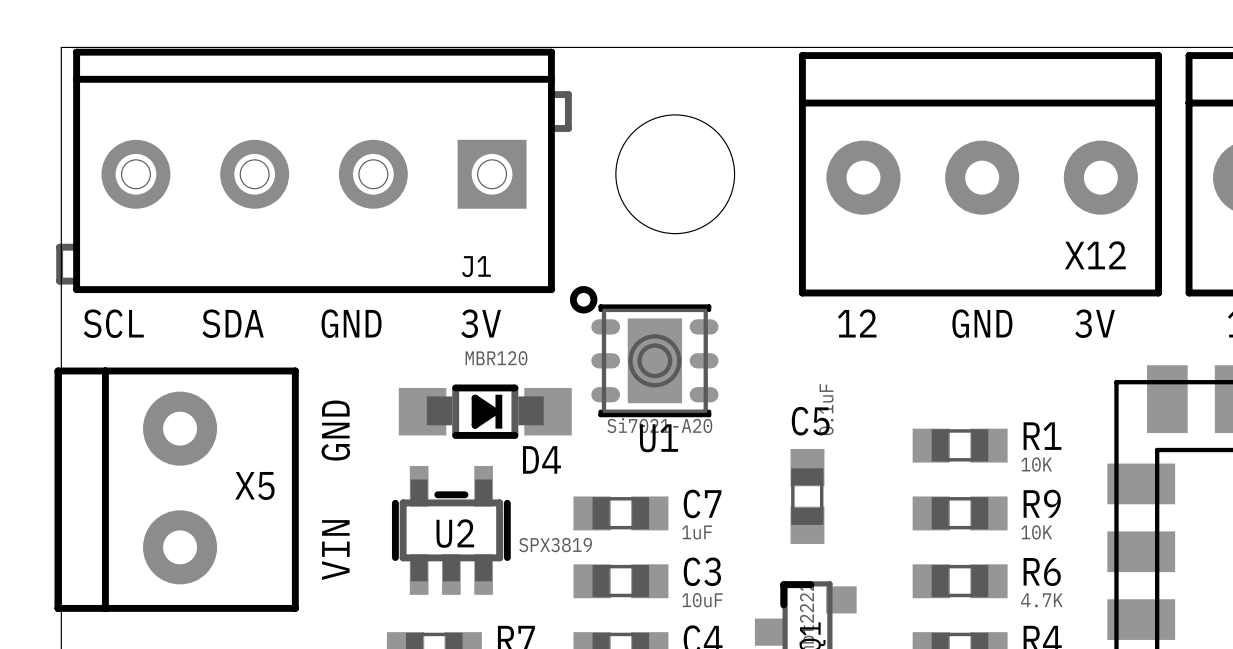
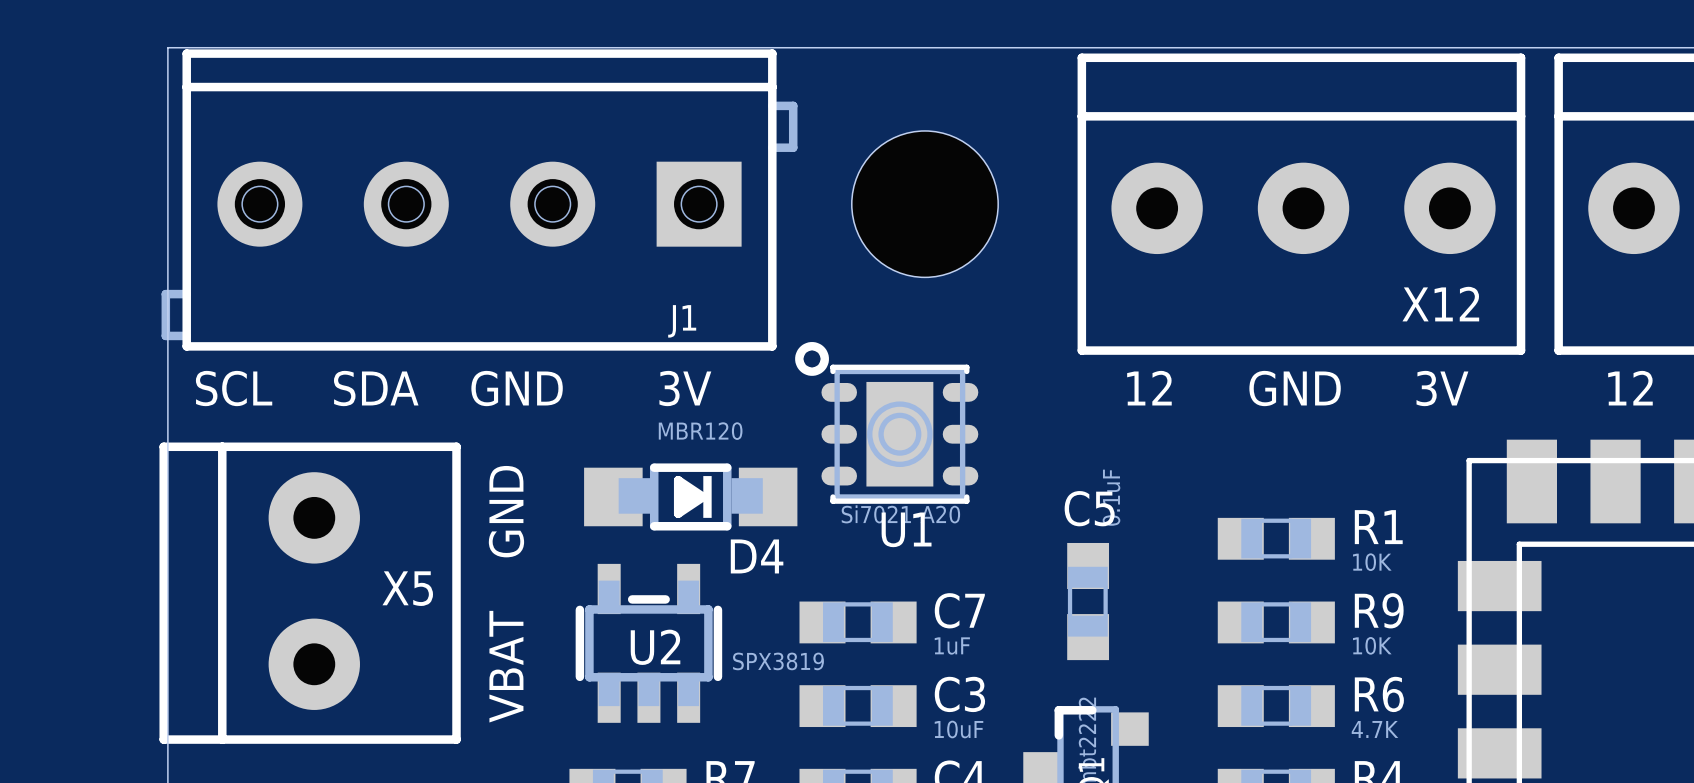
text: VIN (335, 550) -> VBAT (506, 666)

